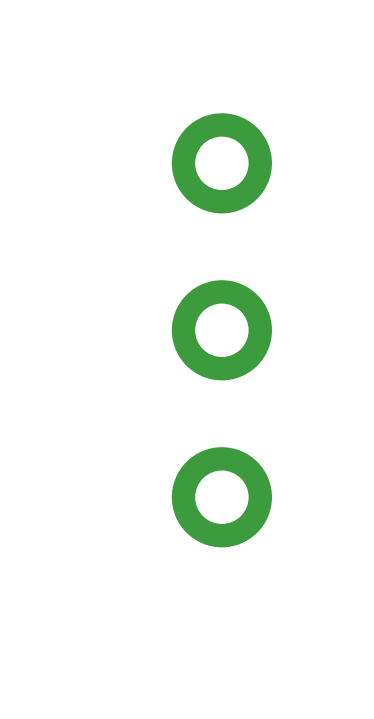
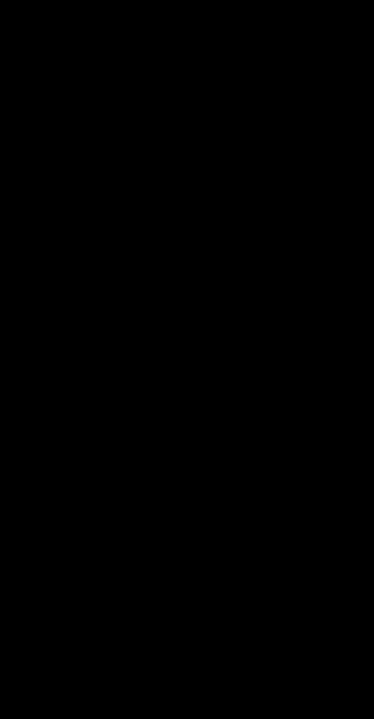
part: (221, 330) -> none

